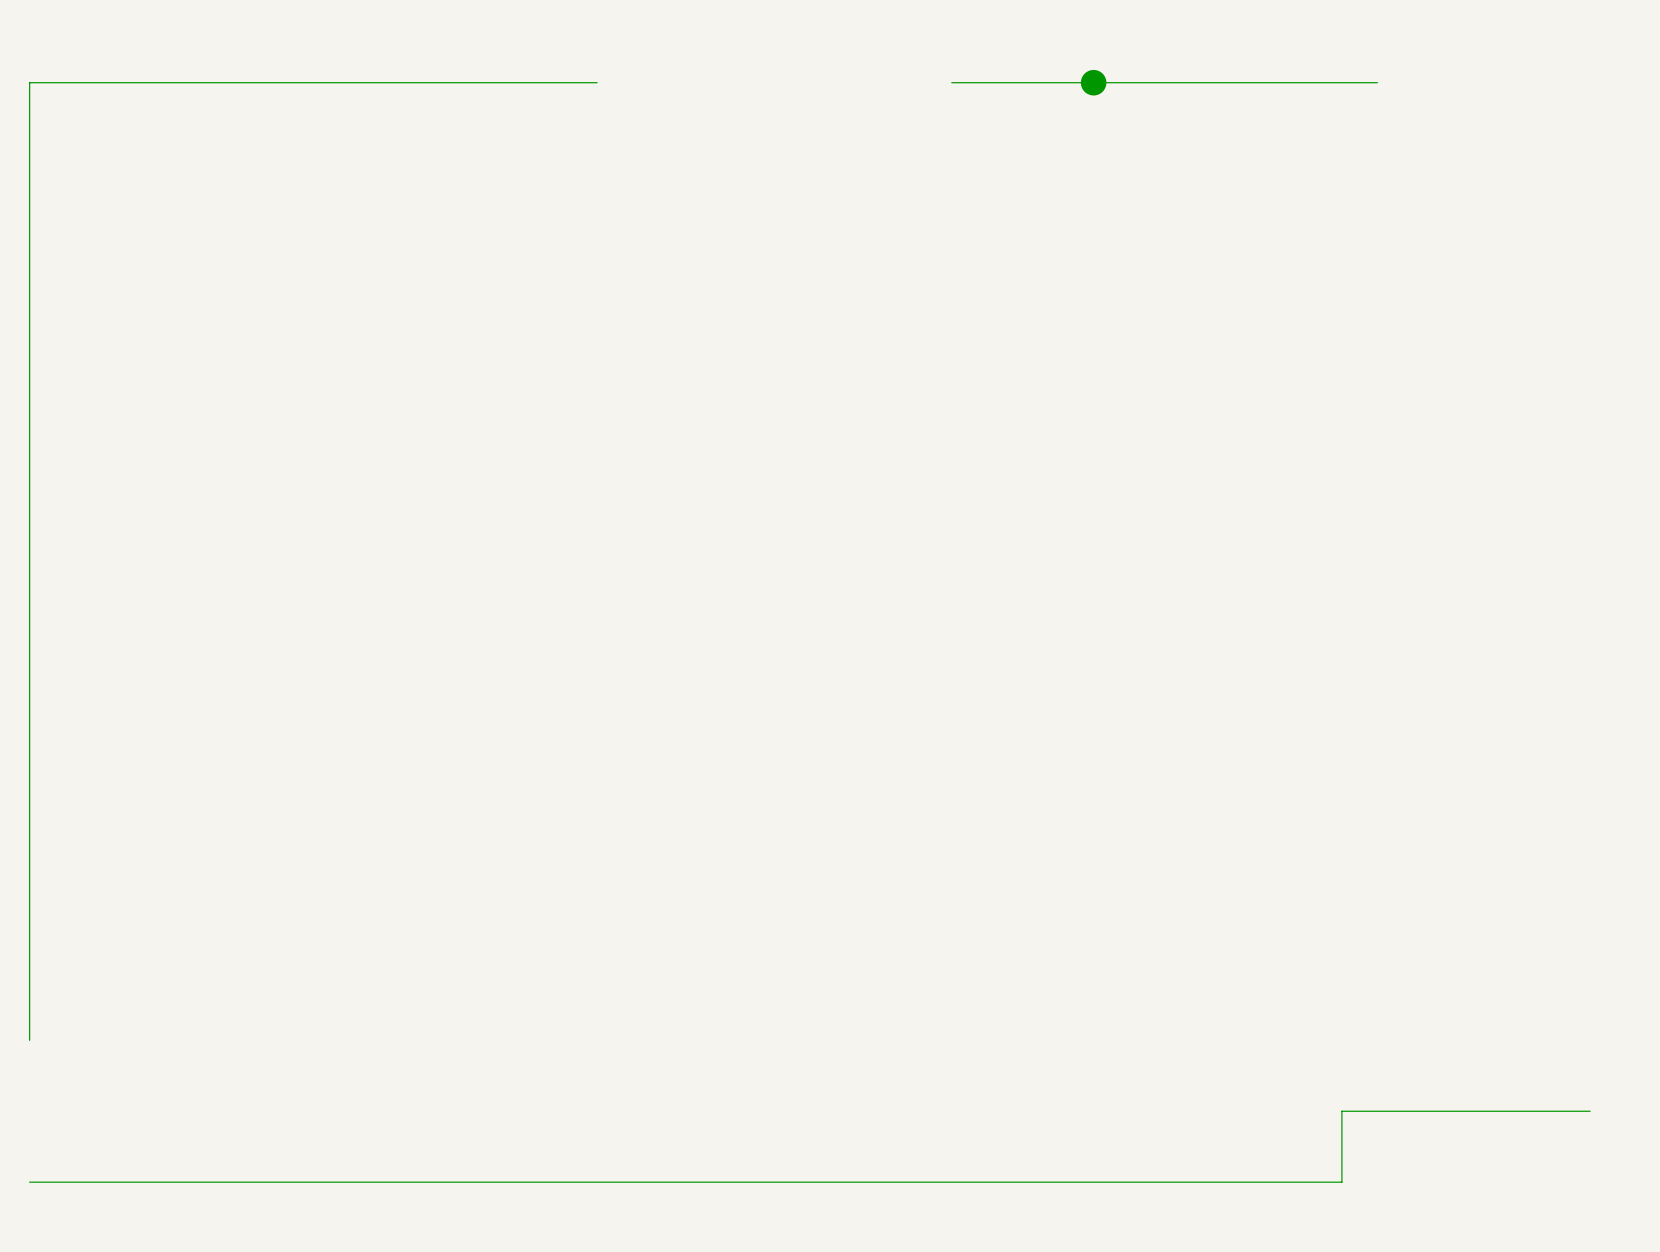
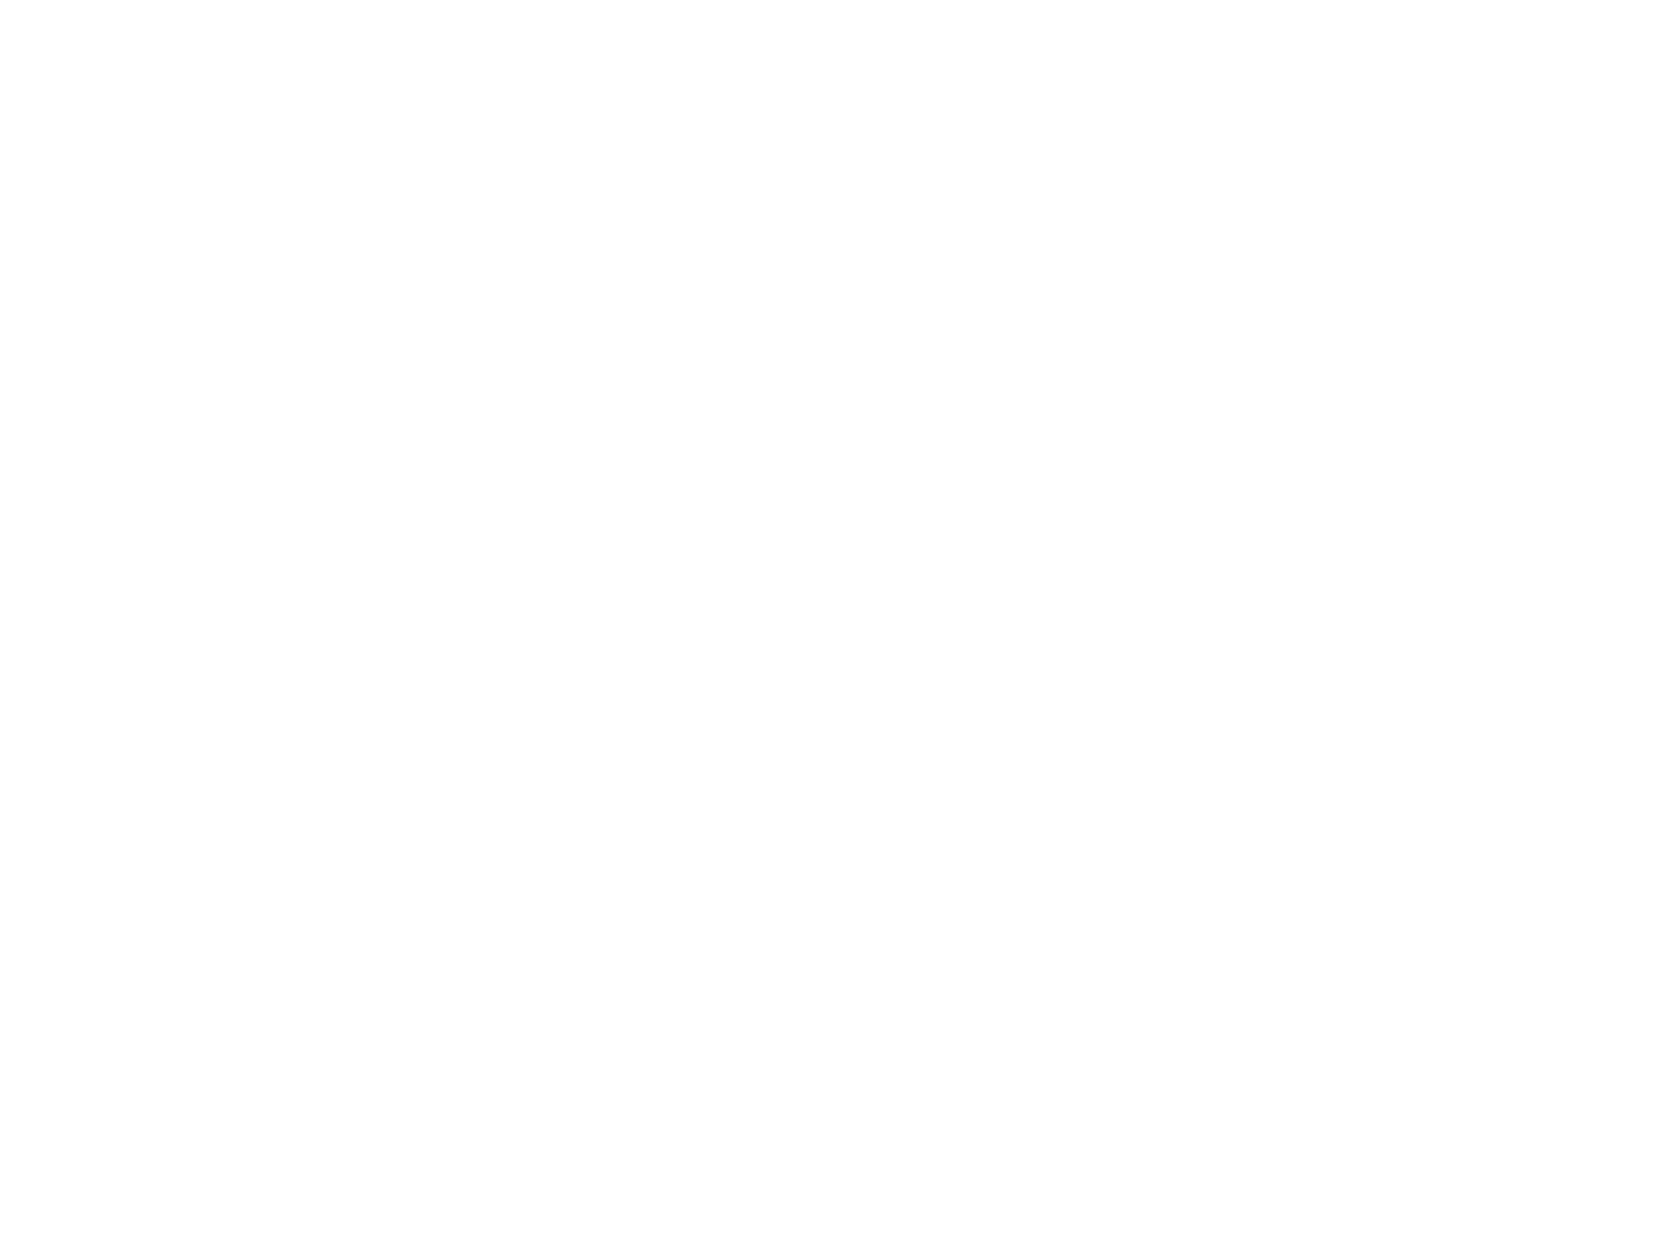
wire: (597, 82) (29, 82) (29, 1040) -> none
wire: (951, 82) (1377, 82) -> none
junction: (1093, 82) -> none
wire: (1590, 1111) (1341, 1111) (1341, 1182) (29, 1182) -> none

